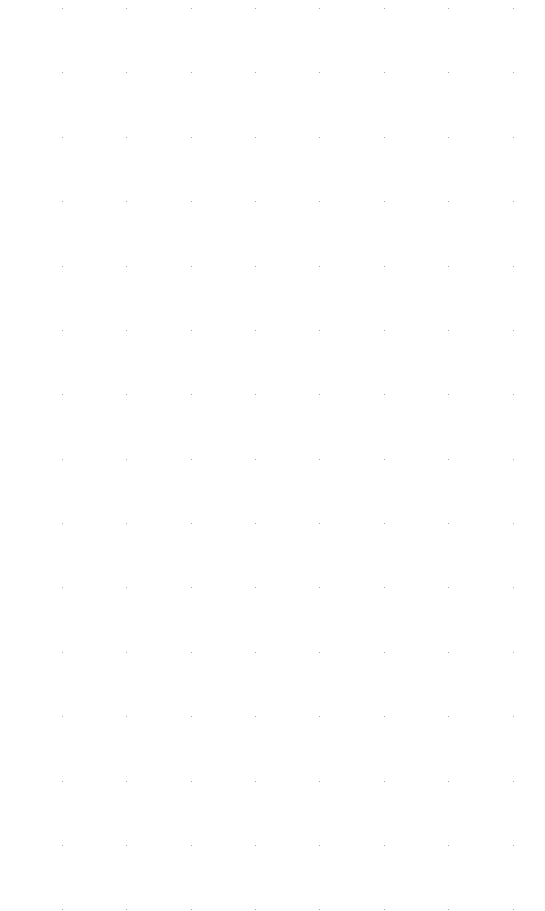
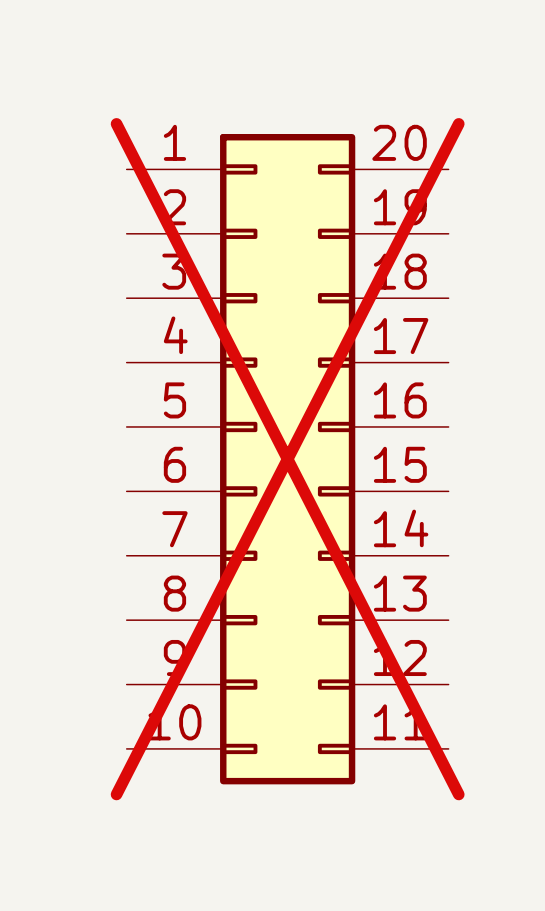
part: none -> (287, 459)

